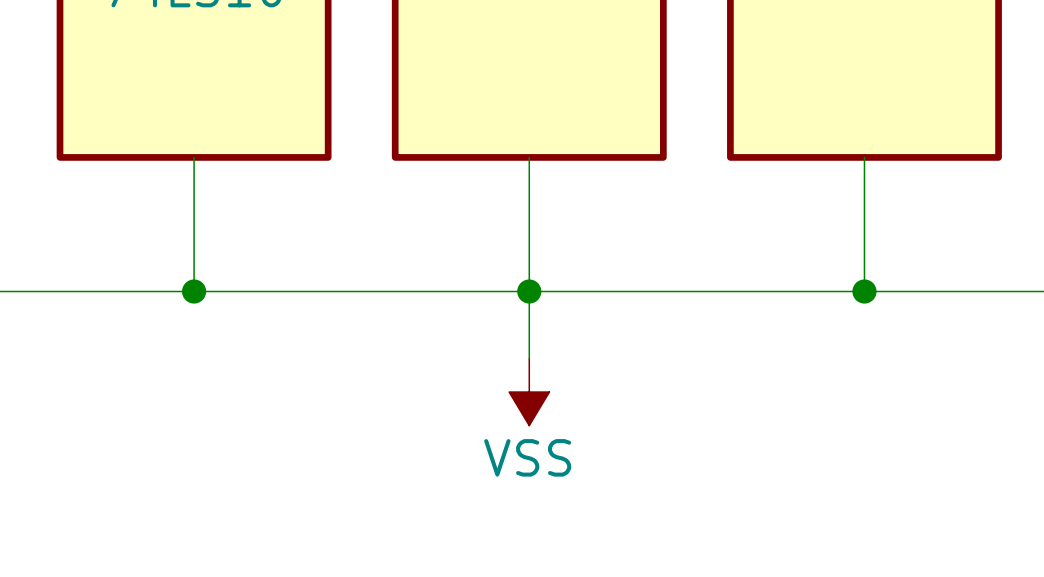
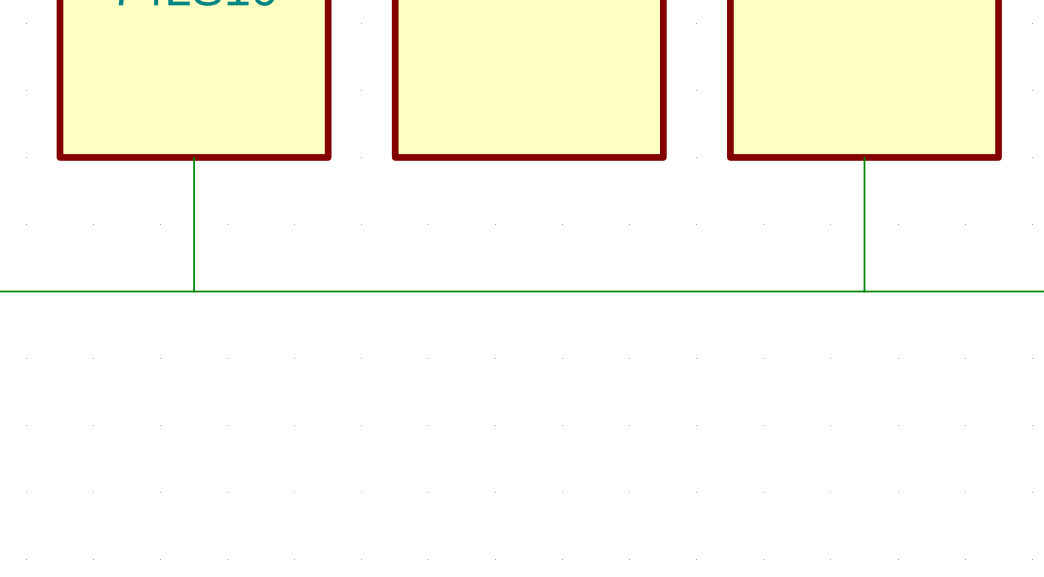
wire: (529, 157) (529, 358) -> none
junction: (194, 291) -> none
junction: (529, 291) -> none
junction: (864, 291) -> none
power symbol: VSS (529, 392) -> none

